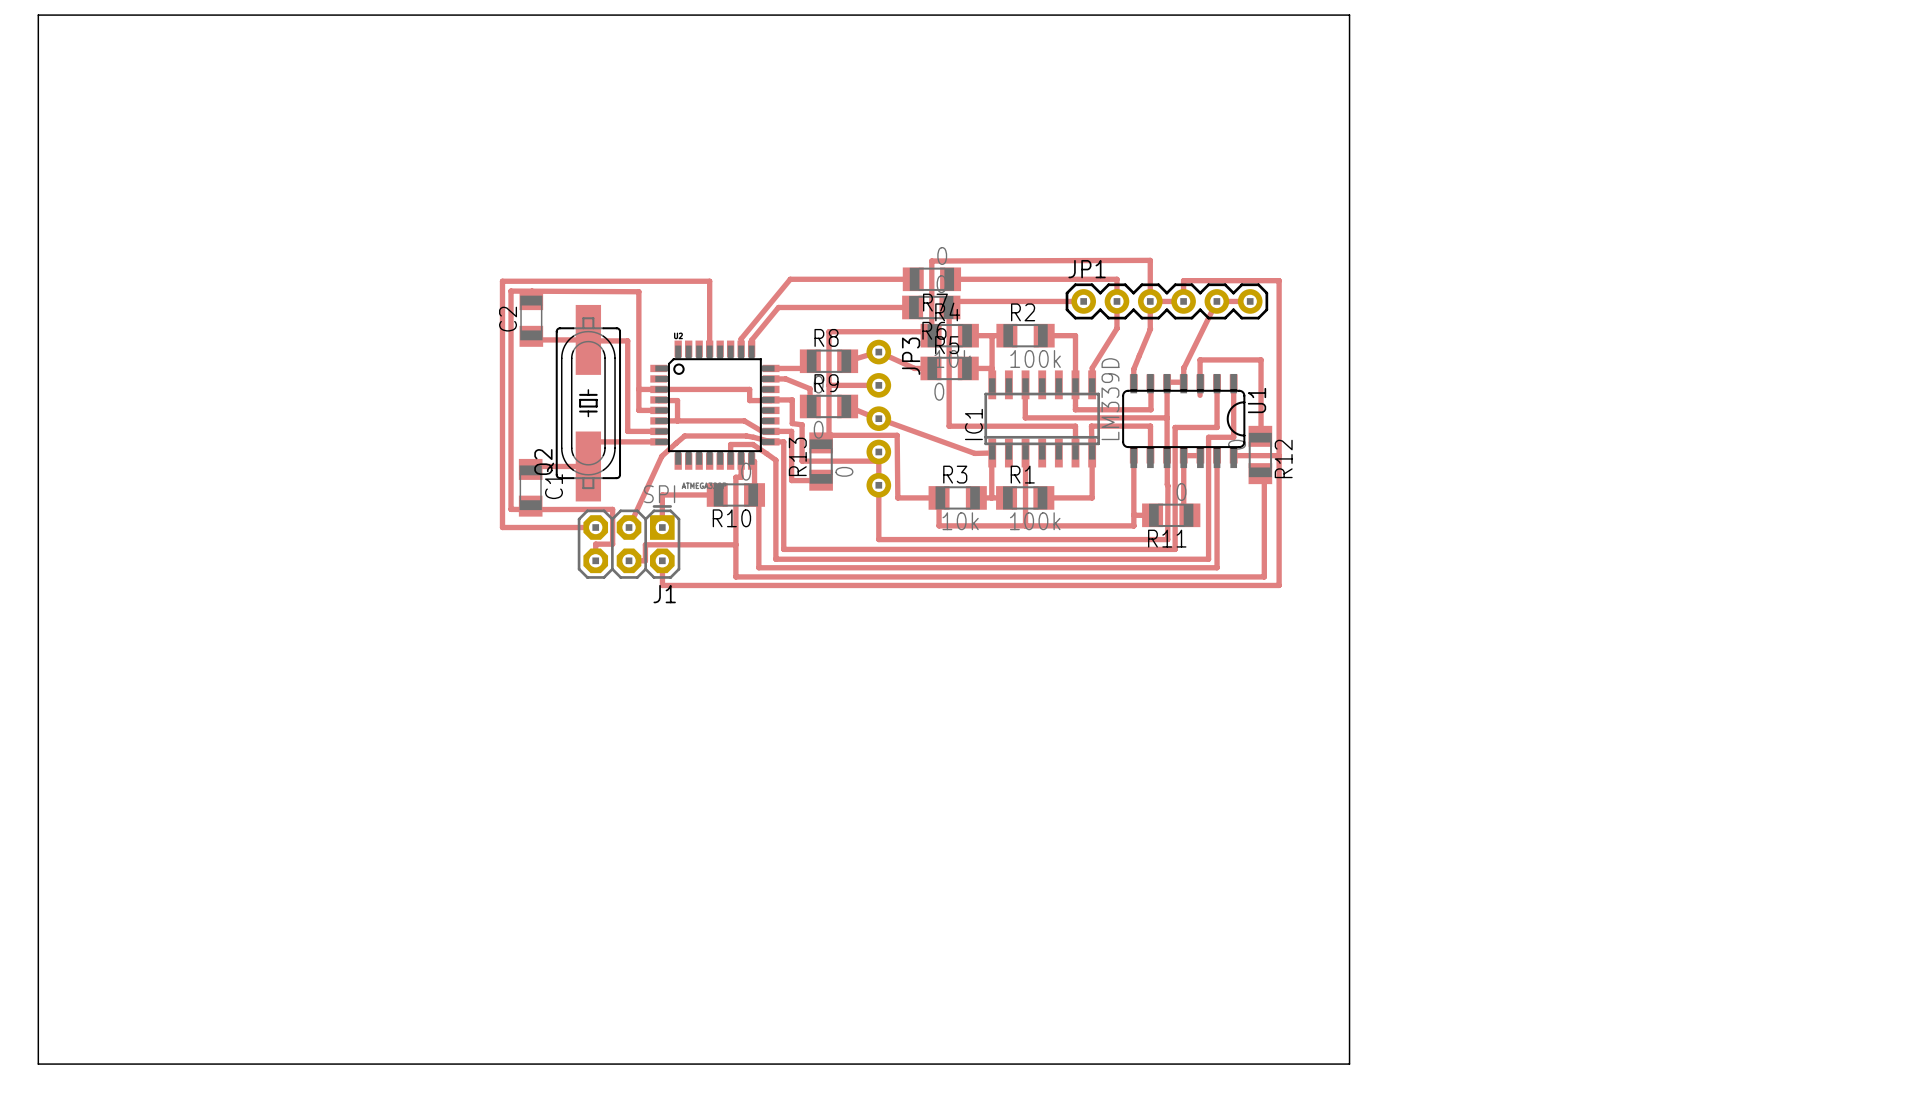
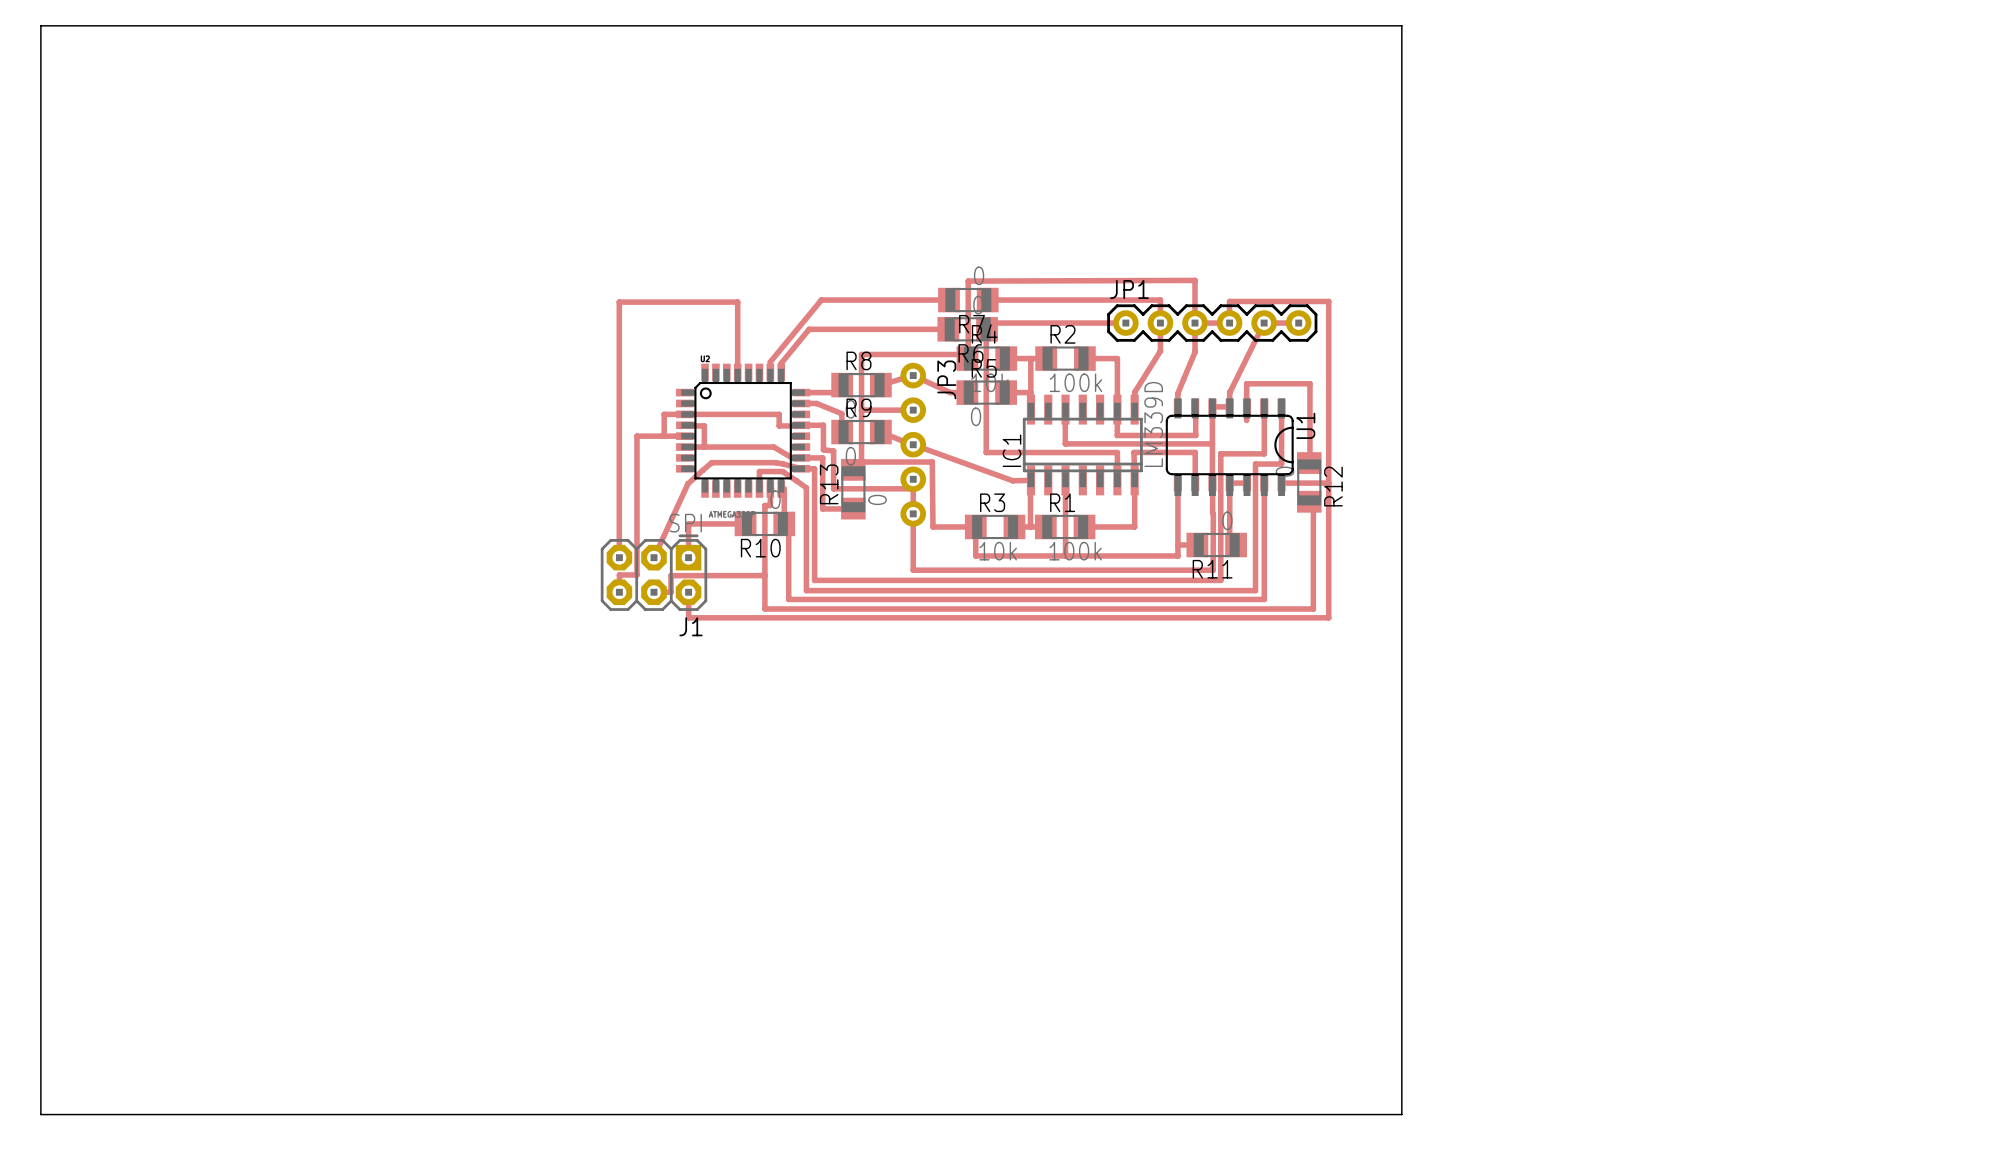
top track: (595, 281) (502, 281) (502, 527) (595, 527) -> (619, 302) (619, 557)
C2: (531, 317) -> none
top track: (531, 336) (531, 339) (627, 340) (627, 431) (658, 431) -> none
top track: (638, 389) (638, 291) (511, 291) (511, 509) (532, 509) -> none
Q2: (588, 403) -> none
top track: (658, 441) (588, 441) (588, 466) (530, 466) (530, 469) -> none
C1: (530, 487) -> none
top track: (612, 509) (532, 509) -> (636, 538) (636, 436) (664, 436)

